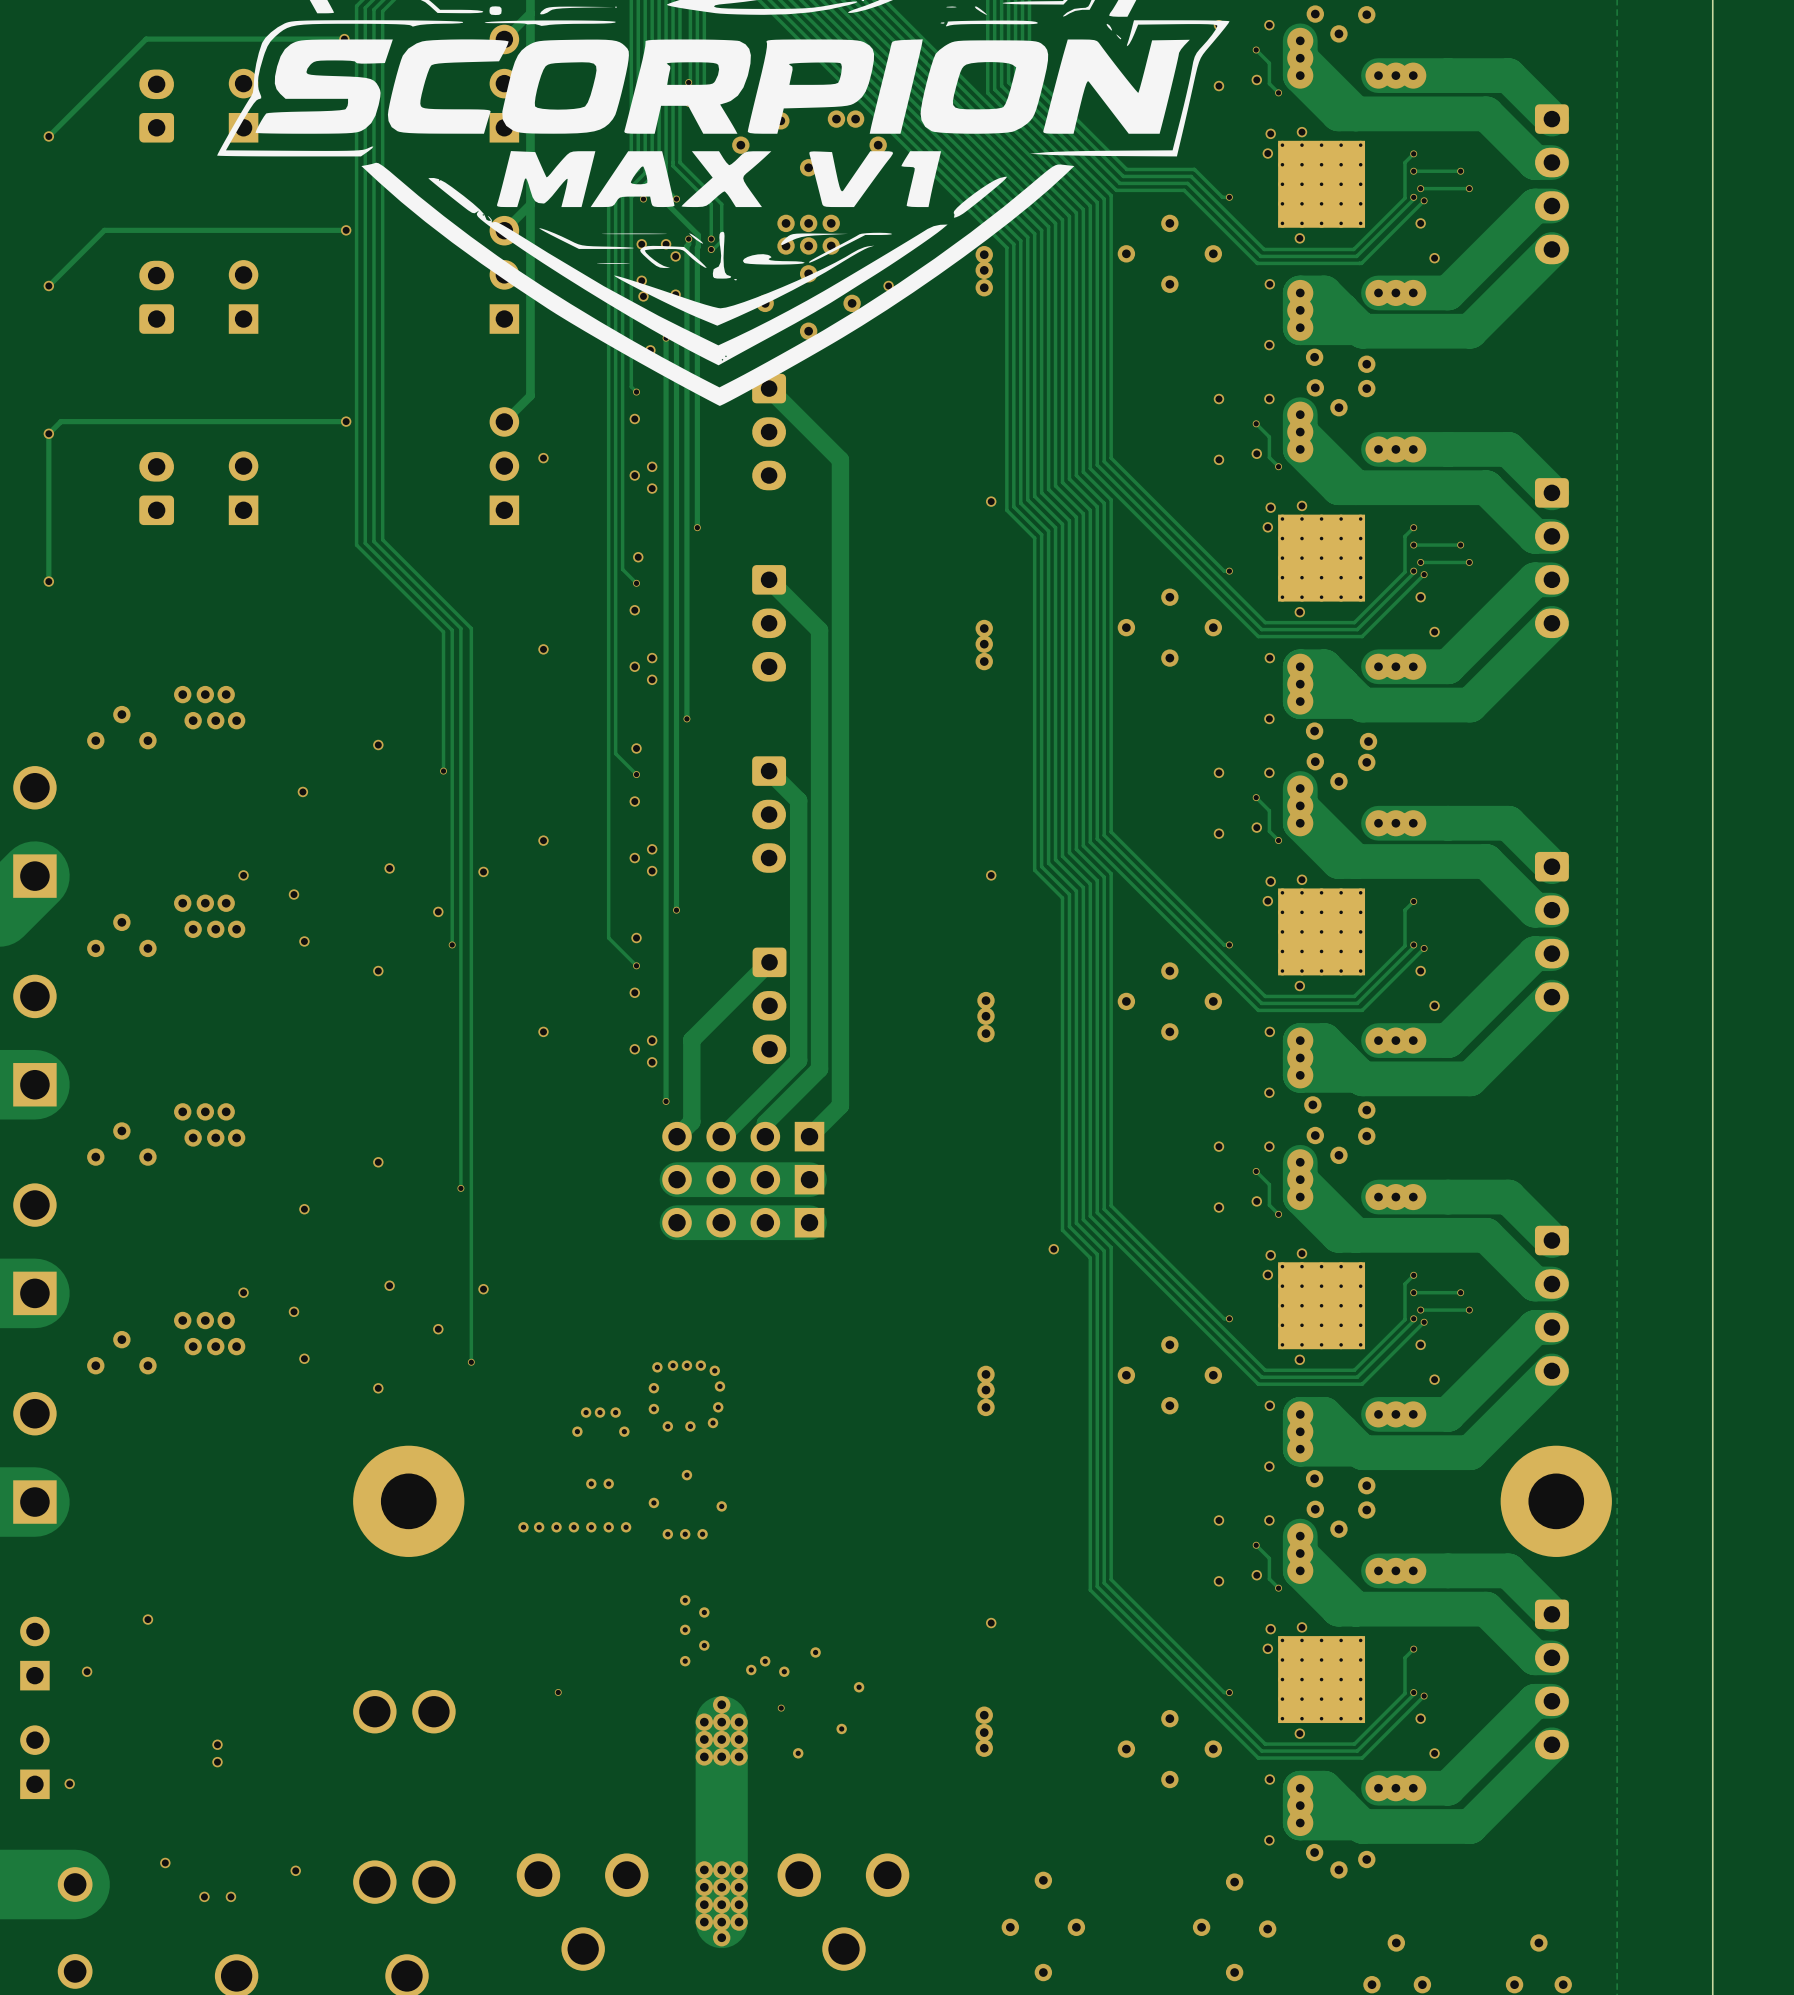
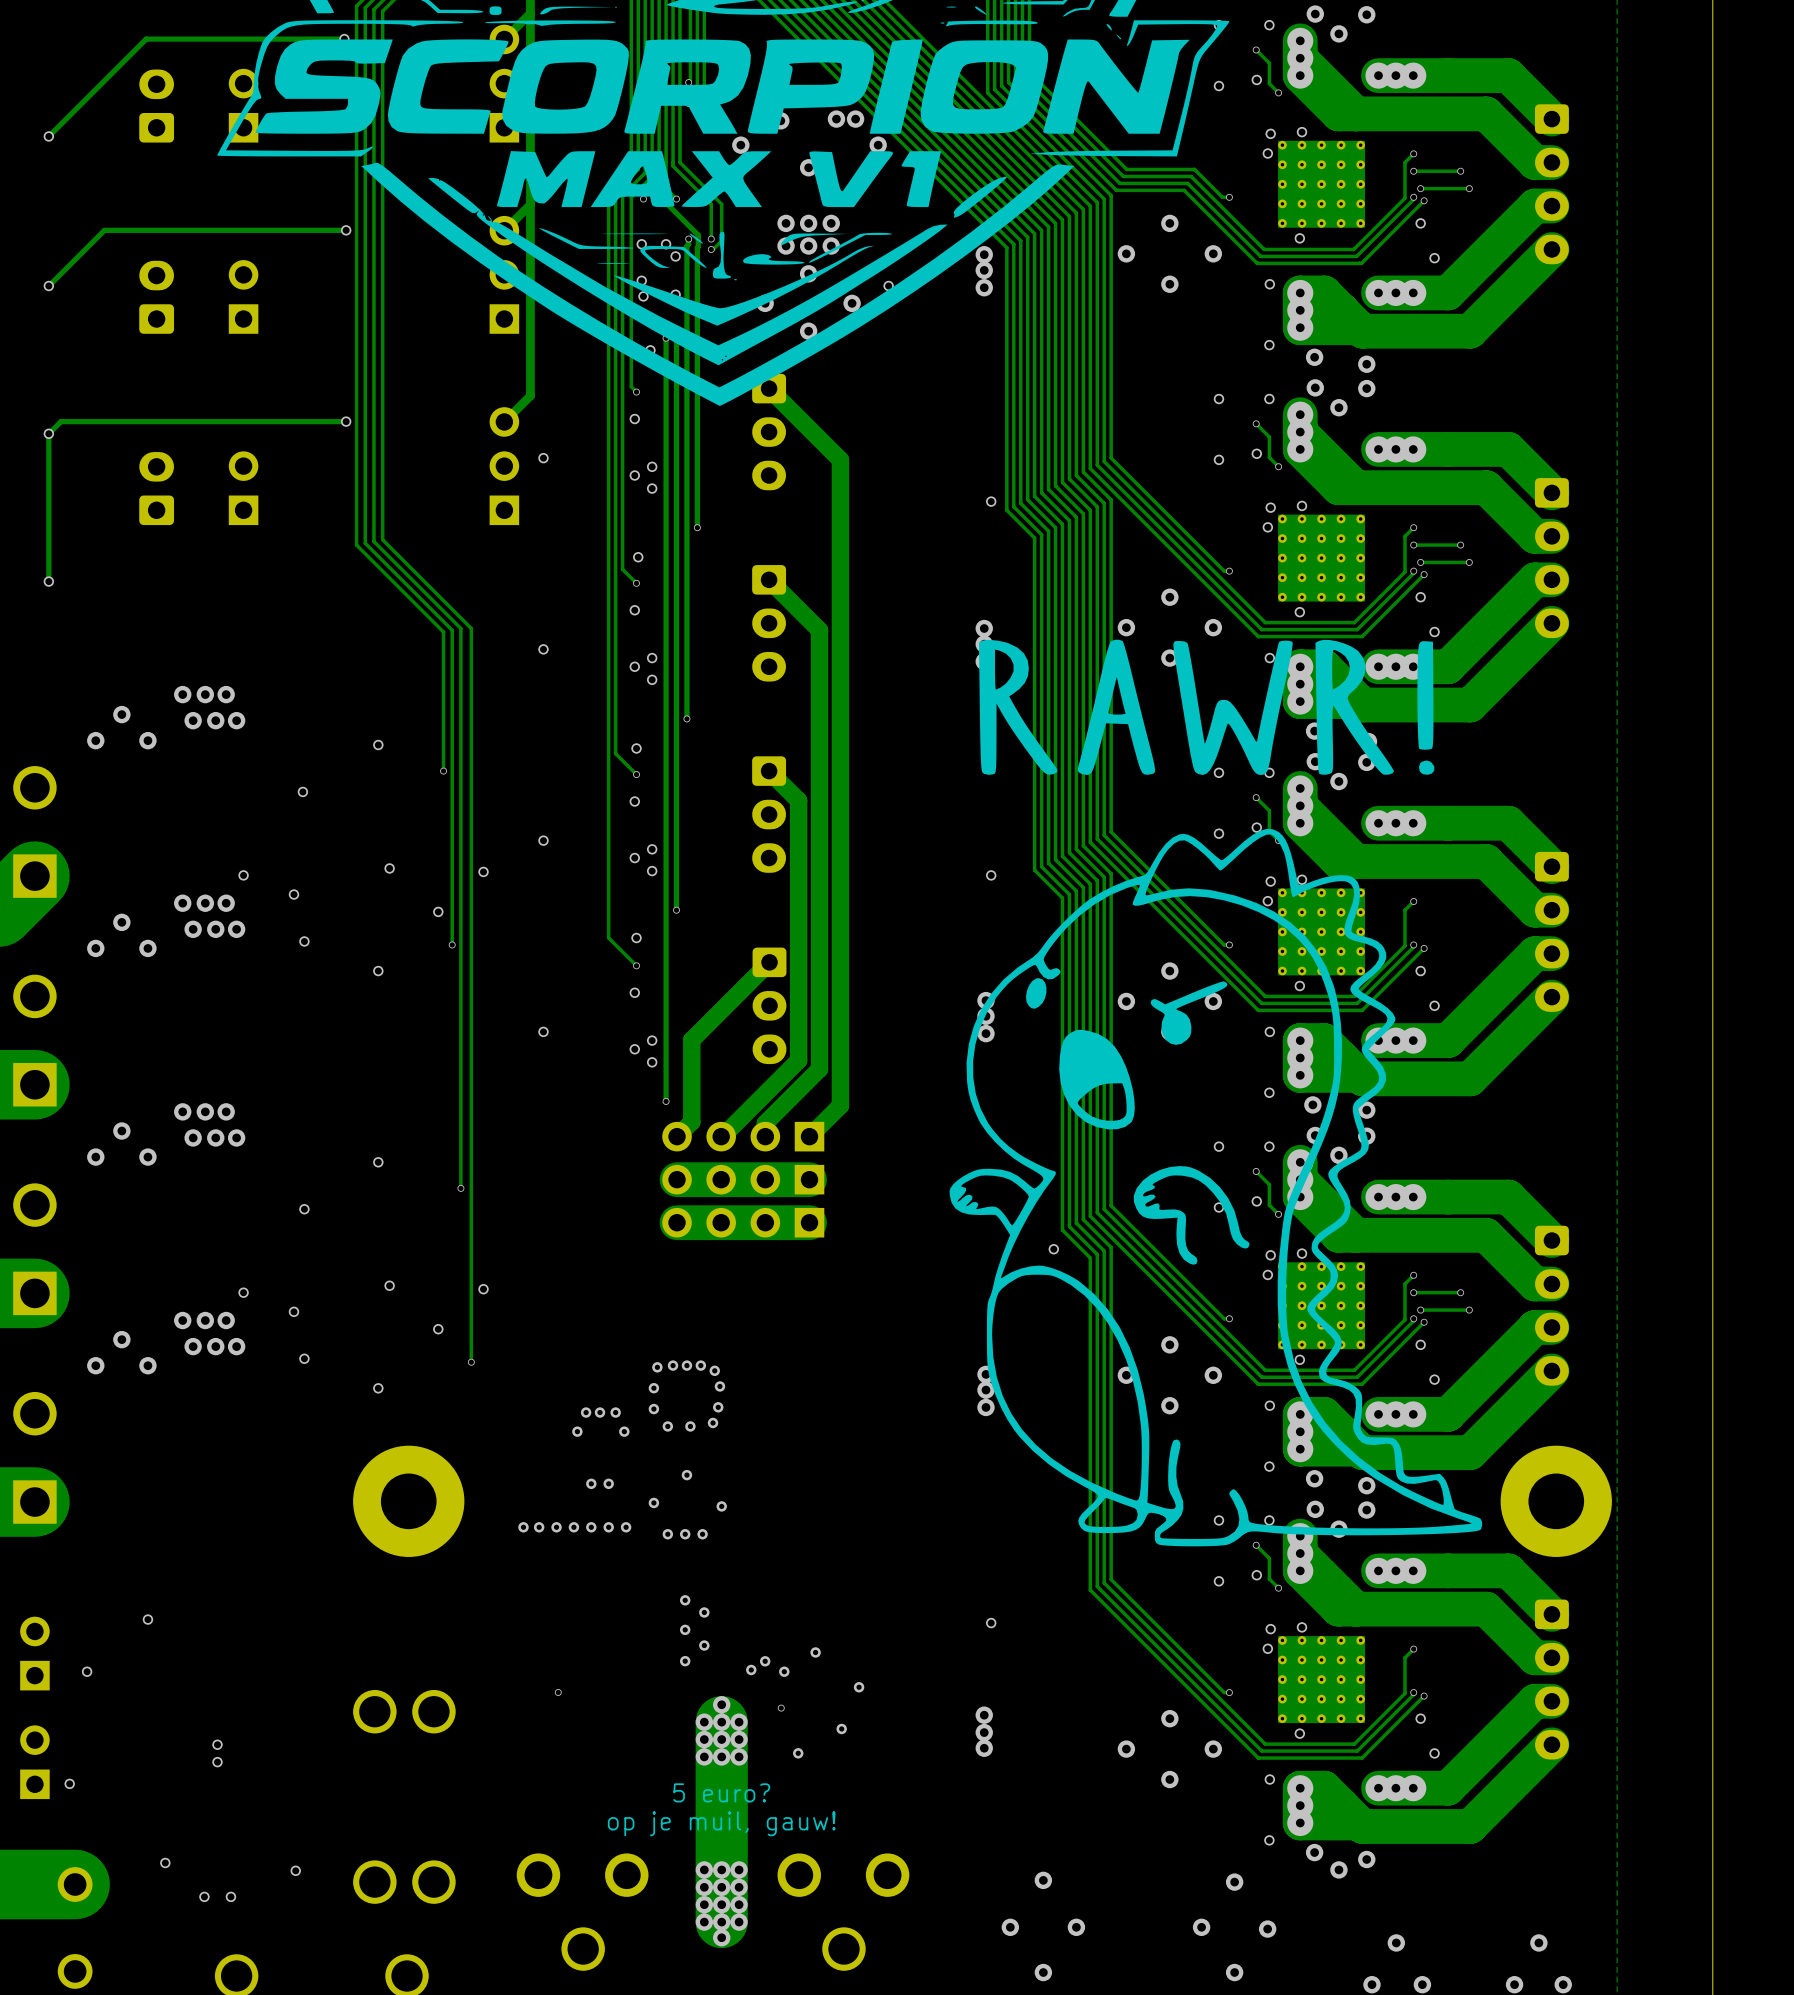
drawing: none -> [949, 639, 1483, 1547]
text: none -> 5 euro? (721, 1792)
text: none -> op je muil, gauw! (721, 1823)

